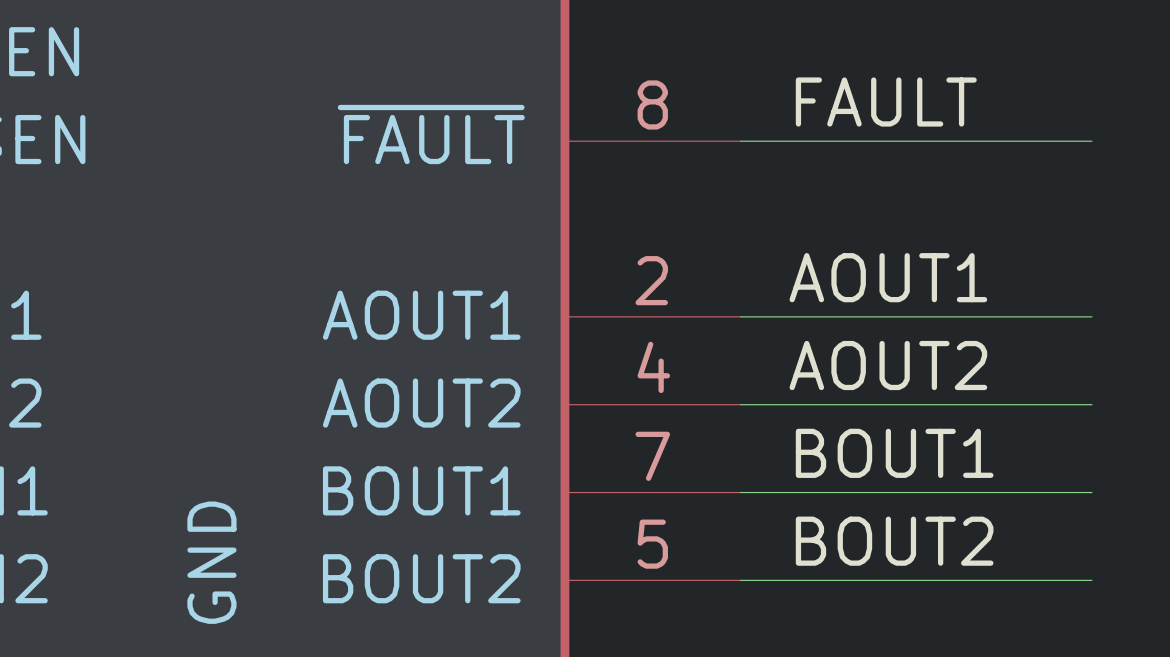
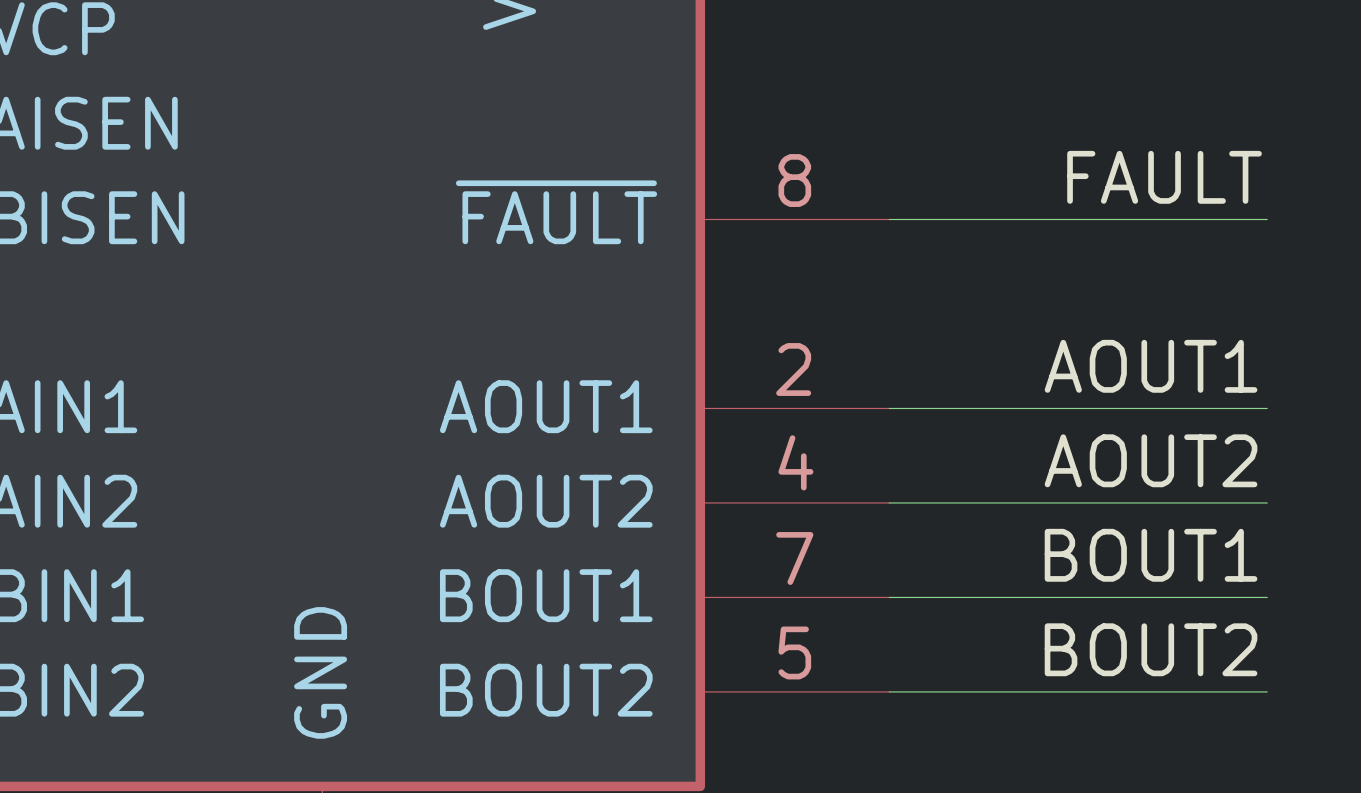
label position: FAULT (886, 102) -> FAULT (1164, 177)
label position: AOUT1 (888, 277) -> AOUT1 (1151, 366)
label position: AOUT2 (888, 365) -> AOUT2 (1151, 460)
label position: BOUT1 (894, 453) -> BOUT1 (1151, 555)
label position: BOUT2 (894, 541) -> BOUT2 (1151, 649)

